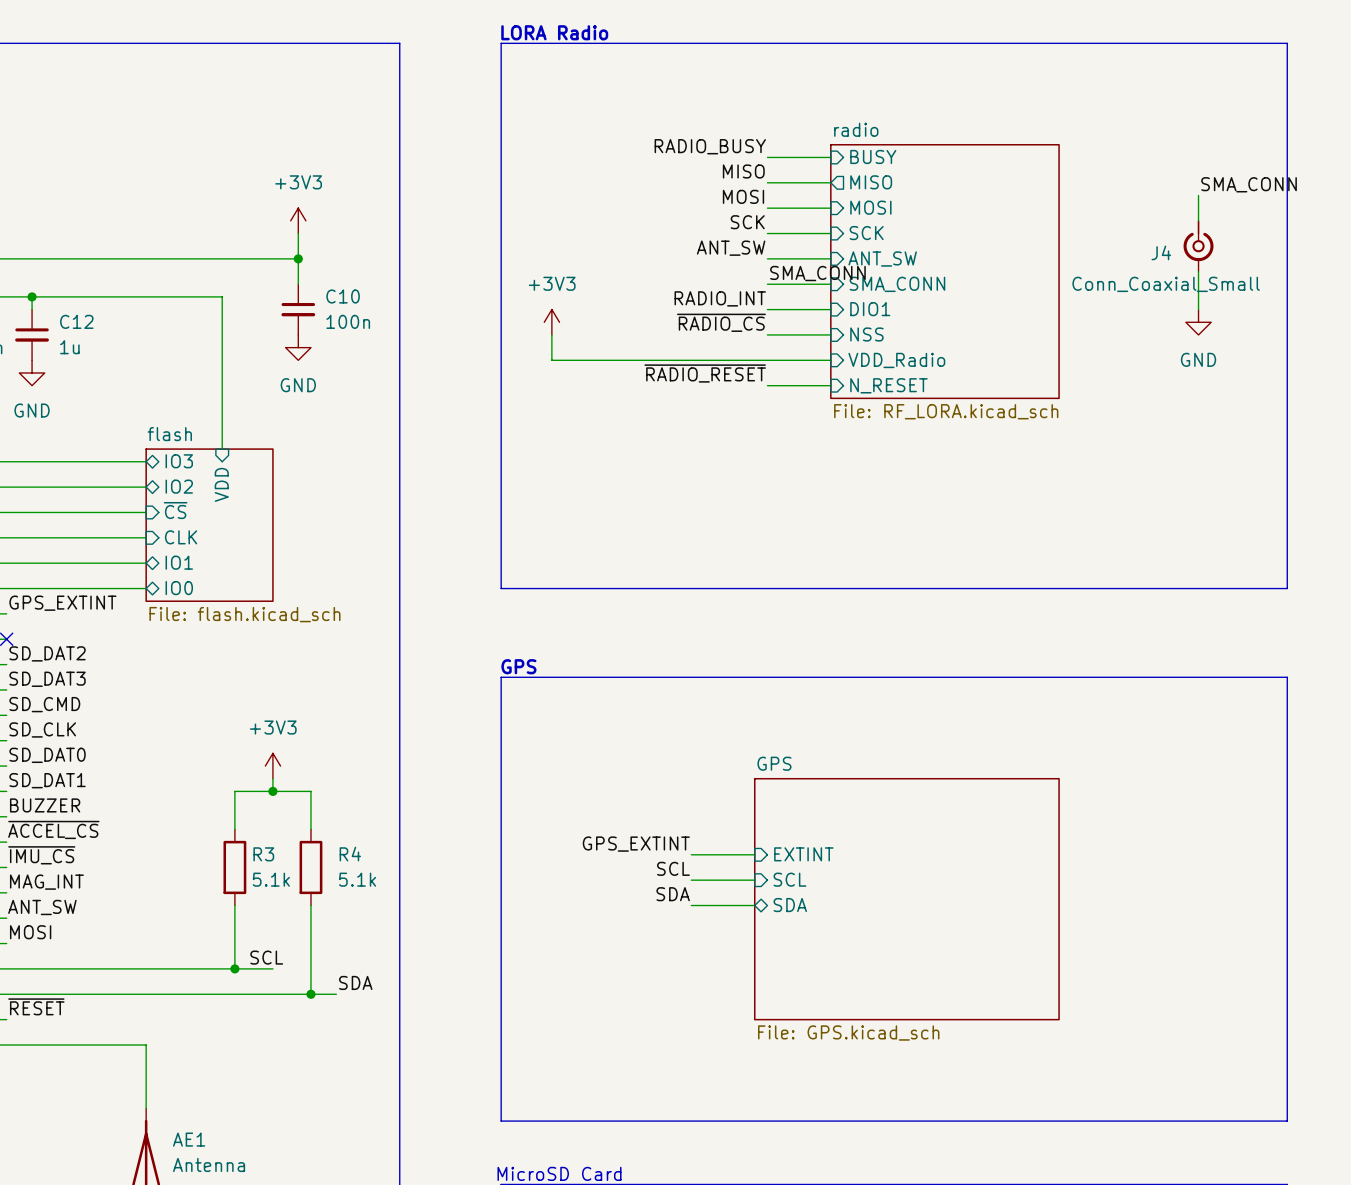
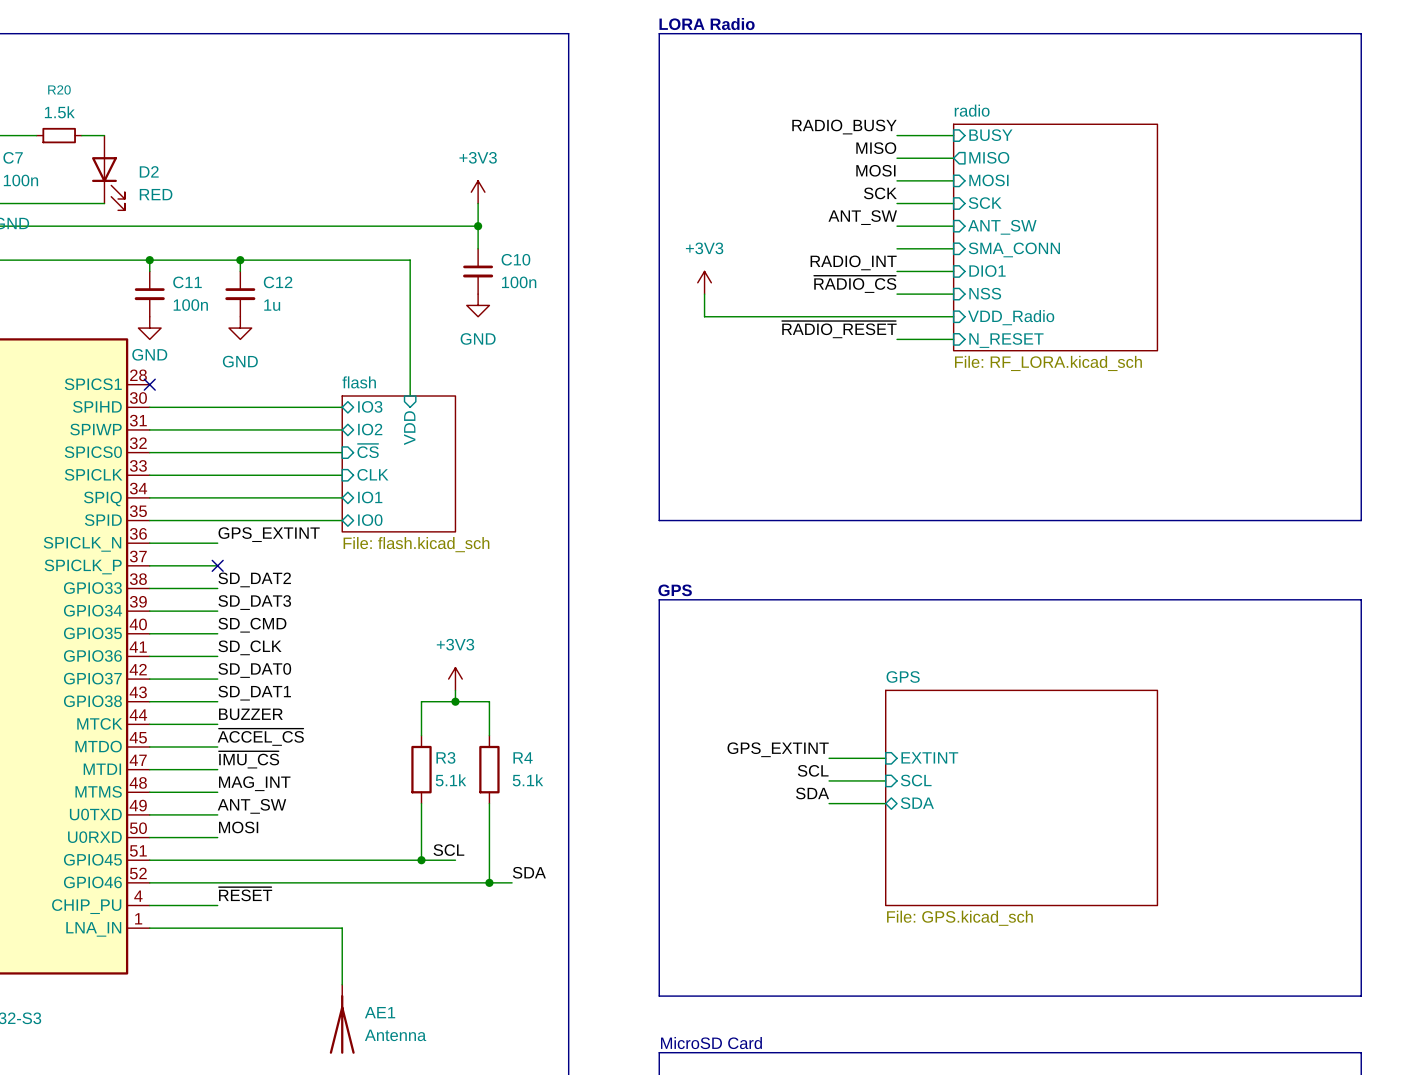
label: SMA_CONN (1249, 184) -> none
wire: (1198, 195) (1198, 220) -> none
J4: Conn_Coaxial_Small (1198, 246) -> none
wire: (1198, 271) (1198, 309) -> none
label: SMA_CONN (817, 273) -> none
power symbol: GND (1198, 322) -> none

